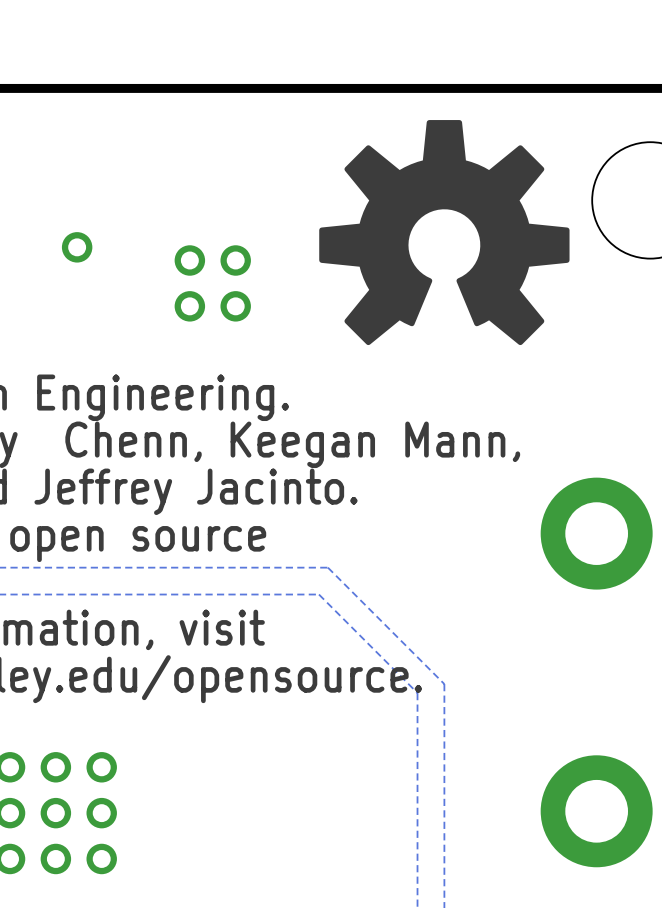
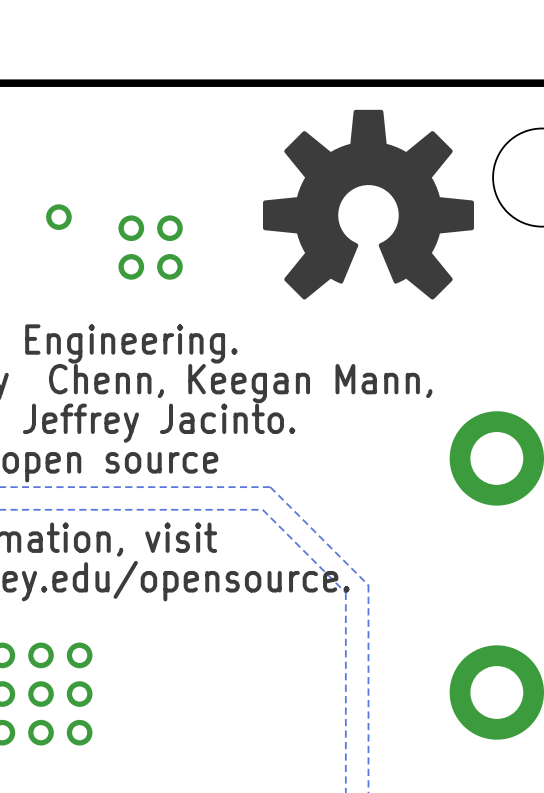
via: none -> (131, 228)
via: (189, 260) -> none
via: none -> (169, 228)
via: (235, 260) -> none
via: none -> (131, 266)
via: (189, 306) -> none
via: none -> (169, 266)
via: (235, 306) -> none

